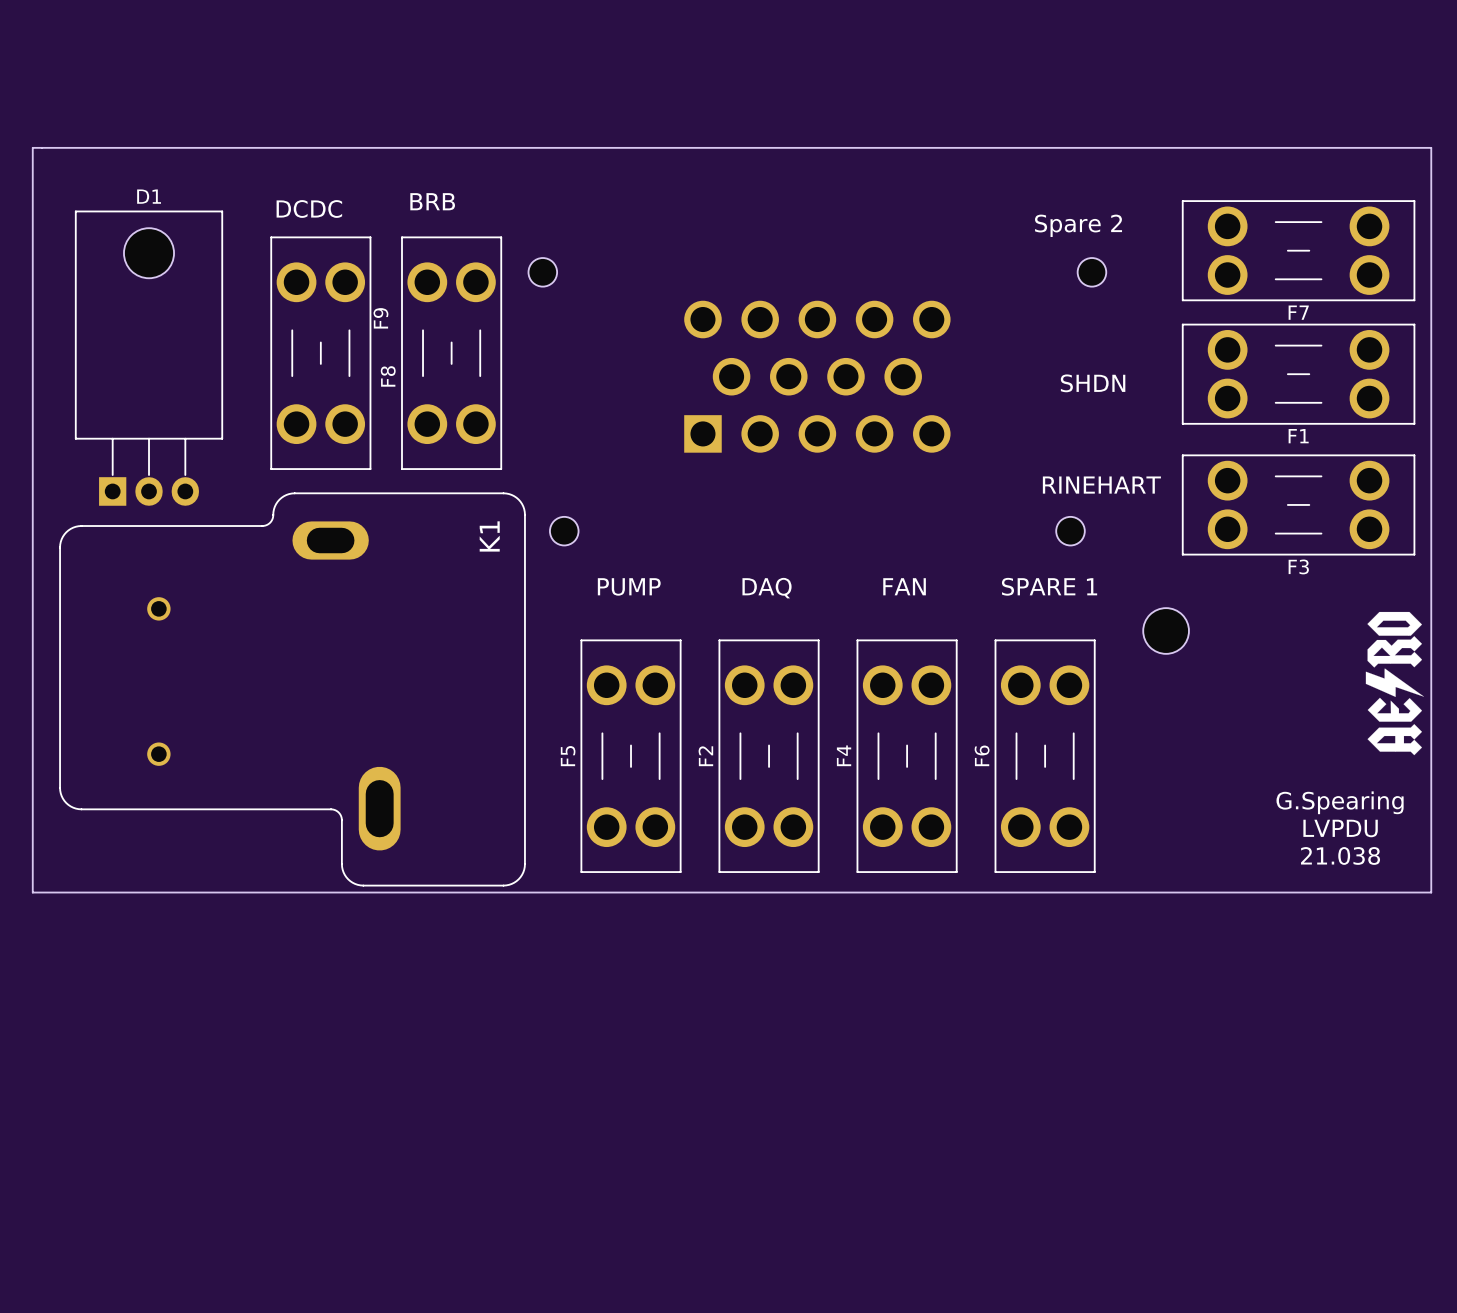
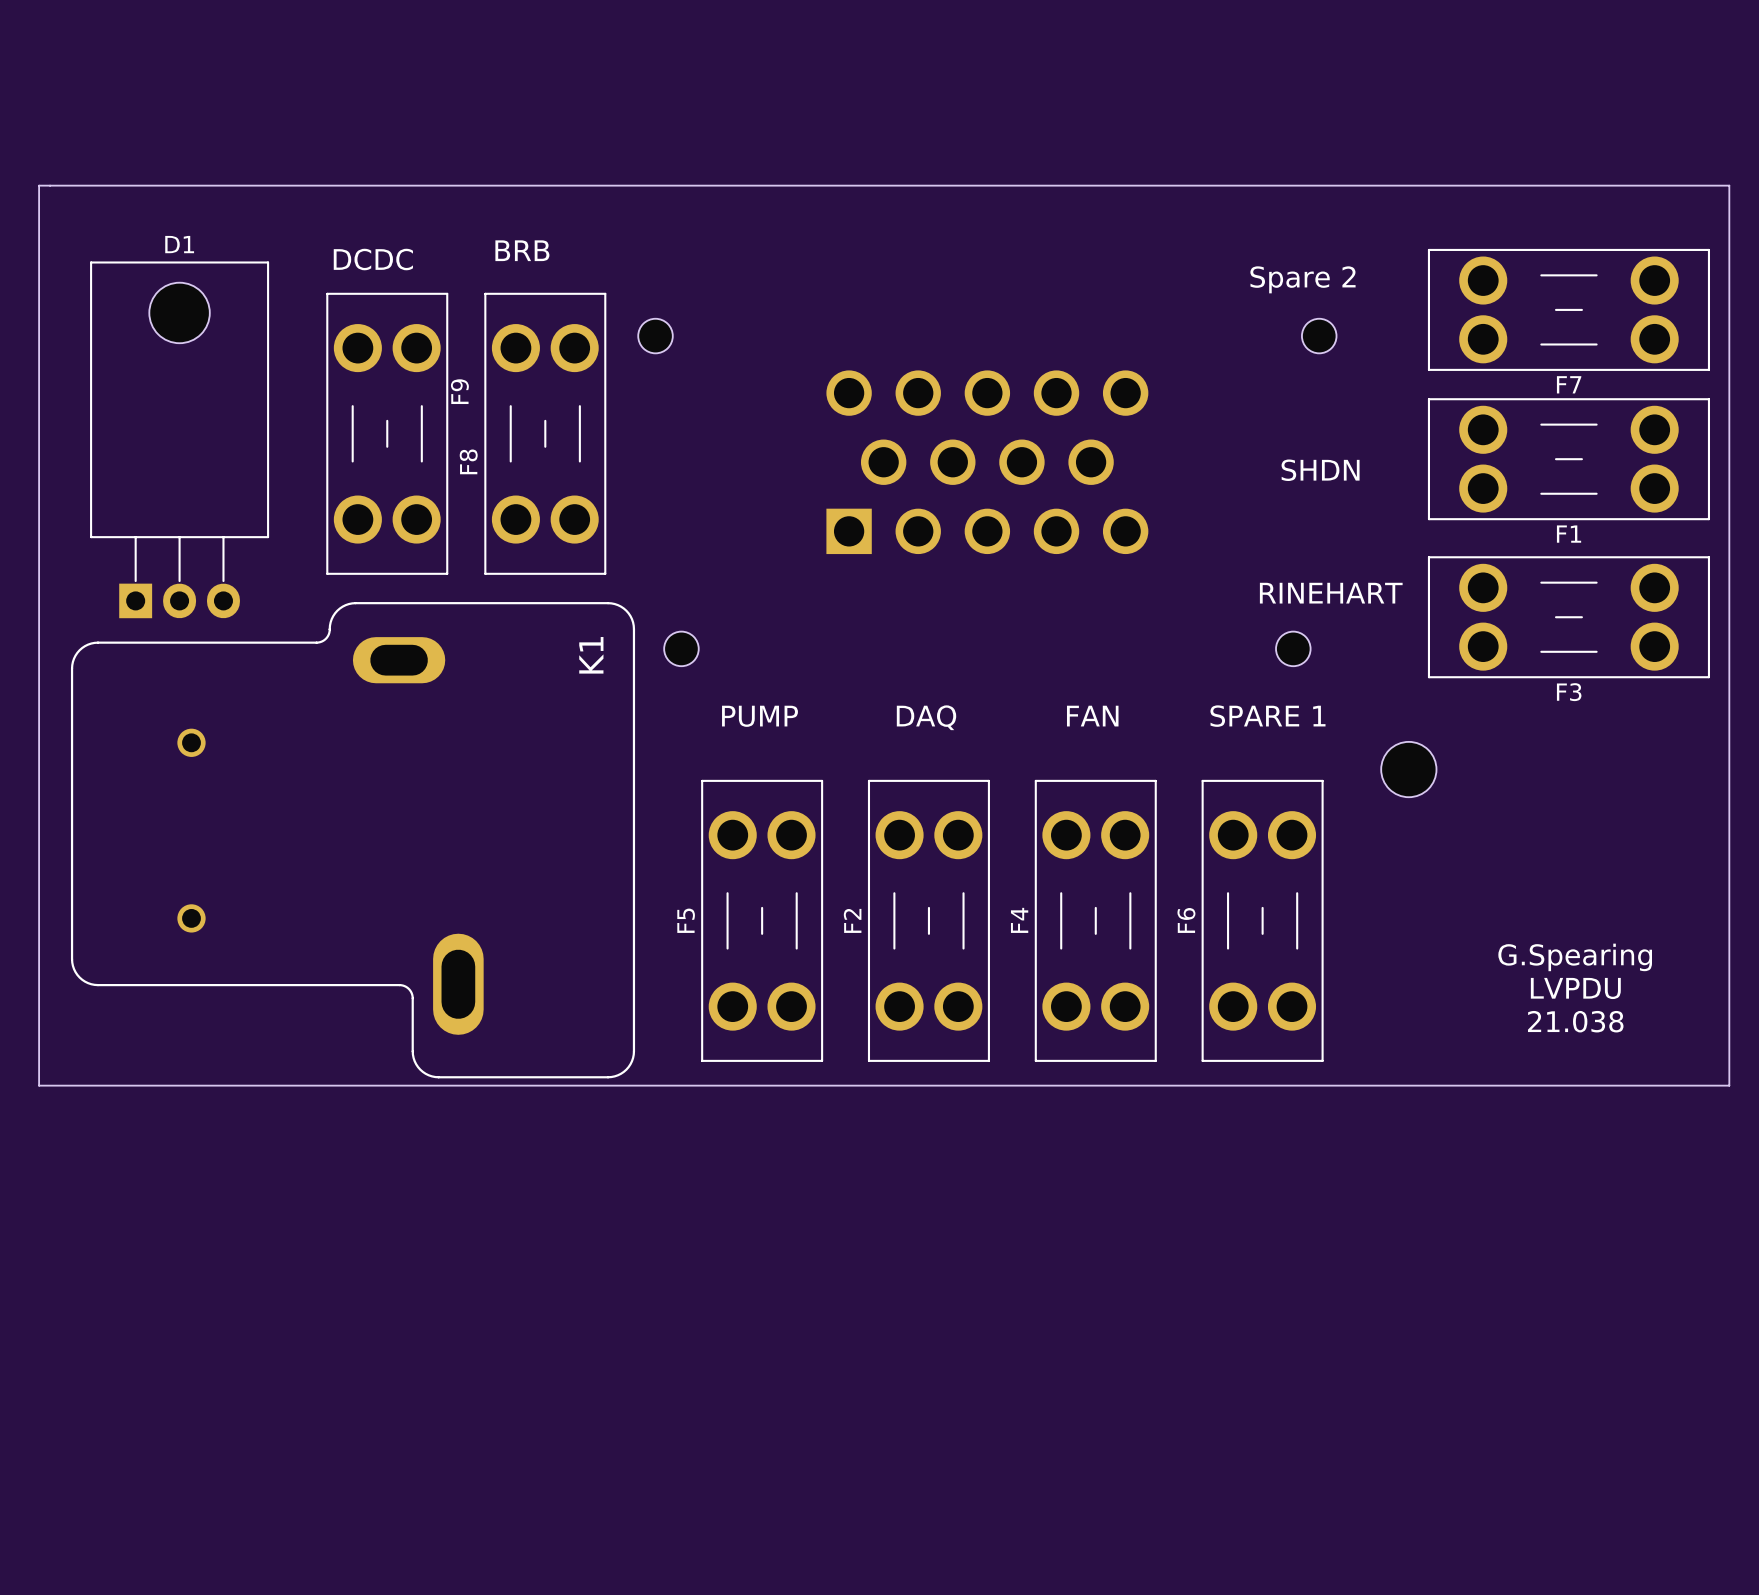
drawing: [1365, 611, 1424, 756] -> none
text position: G.Spearing (1340, 802) -> G.Spearing (1575, 957)
text position: LVPDU (1340, 828) -> LVPDU (1575, 988)
text position: 21.038 (1340, 855) -> 21.038 (1575, 1021)

